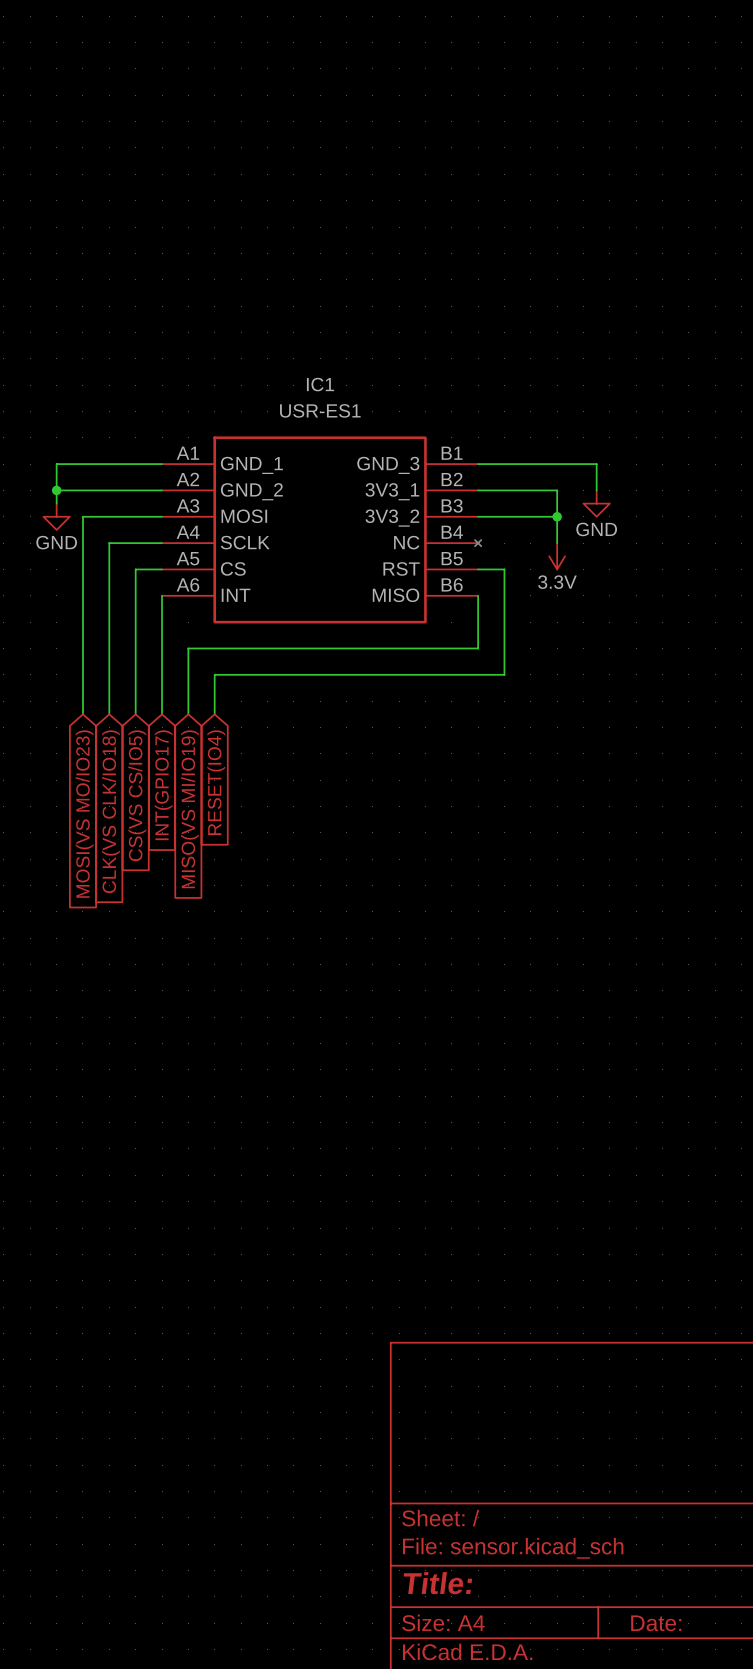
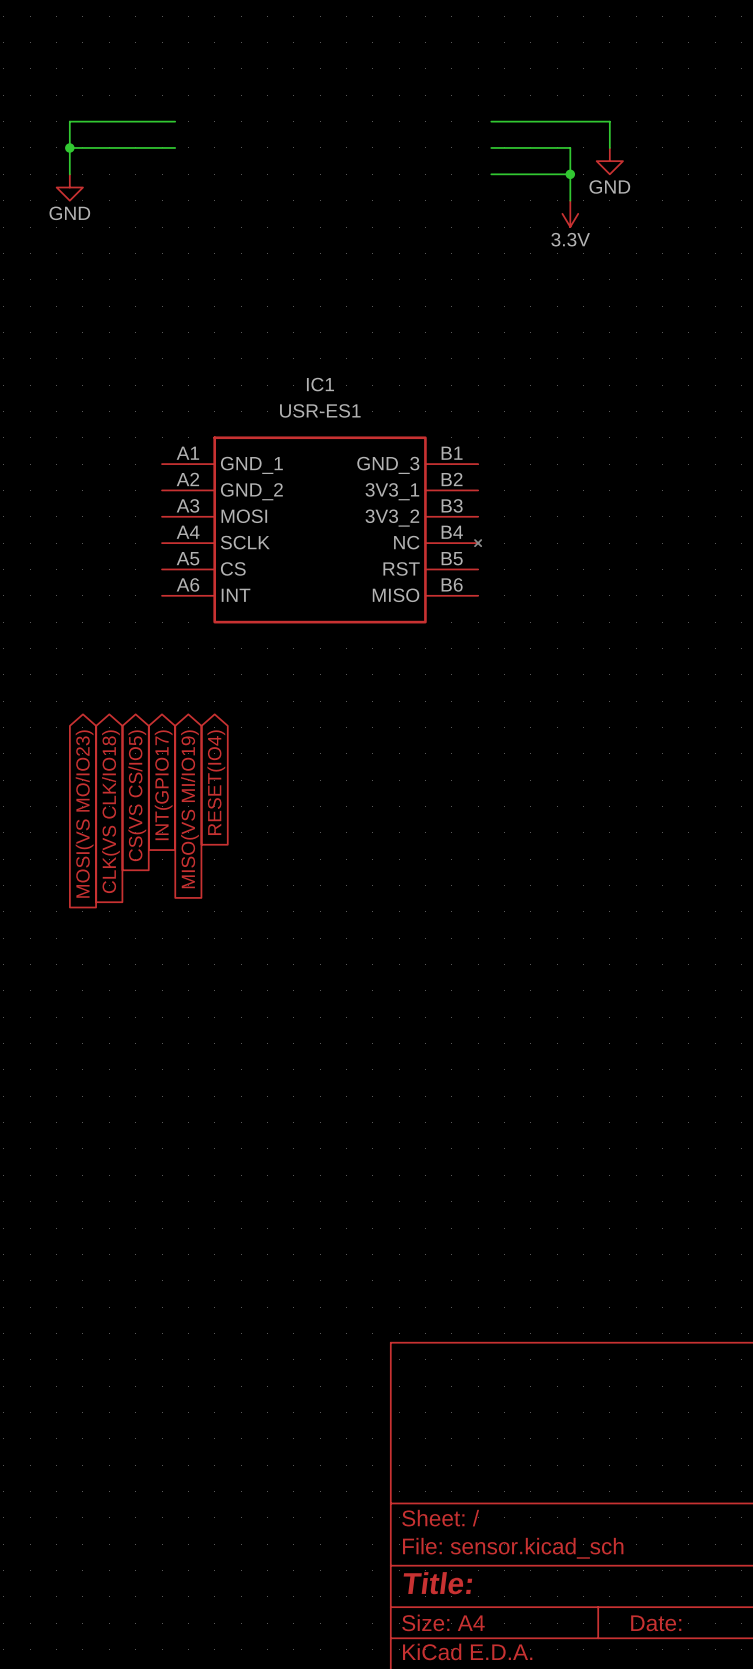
wire: none -> (175, 121) (69, 121) (69, 174)
wire: none -> (491, 121) (609, 121) (609, 147)
wire: none -> (69, 147) (175, 147)
junction: none -> (69, 147)
wire: none -> (491, 147) (570, 147) (570, 200)
power symbol: none -> GND (609, 161)
wire: none -> (491, 174) (570, 174)
junction: none -> (570, 174)
power symbol: none -> GND (69, 187)
power symbol: none -> 3.3V (570, 213)
wire: (162, 464) (56, 464) (56, 503) -> none
wire: (478, 464) (596, 464) (596, 490) -> none
wire: (56, 490) (162, 490) -> none
junction: (56, 490) -> none
wire: (478, 490) (557, 490) (557, 543) -> none
power symbol: GND (596, 503) -> none
power symbol: GND (56, 516) -> none
wire: (162, 516) (82, 516) (82, 714) -> none
wire: (478, 516) (557, 516) -> none
junction: (557, 516) -> none
wire: (162, 543) (109, 543) (109, 714) -> none
power symbol: 3.3V (557, 556) -> none
wire: (162, 569) (135, 569) (135, 714) -> none
wire: (478, 569) (504, 569) (504, 674) (214, 674) (214, 714) -> none
wire: (162, 595) (162, 714) -> none
wire: (478, 595) (478, 648) (188, 648) (188, 714) -> none

